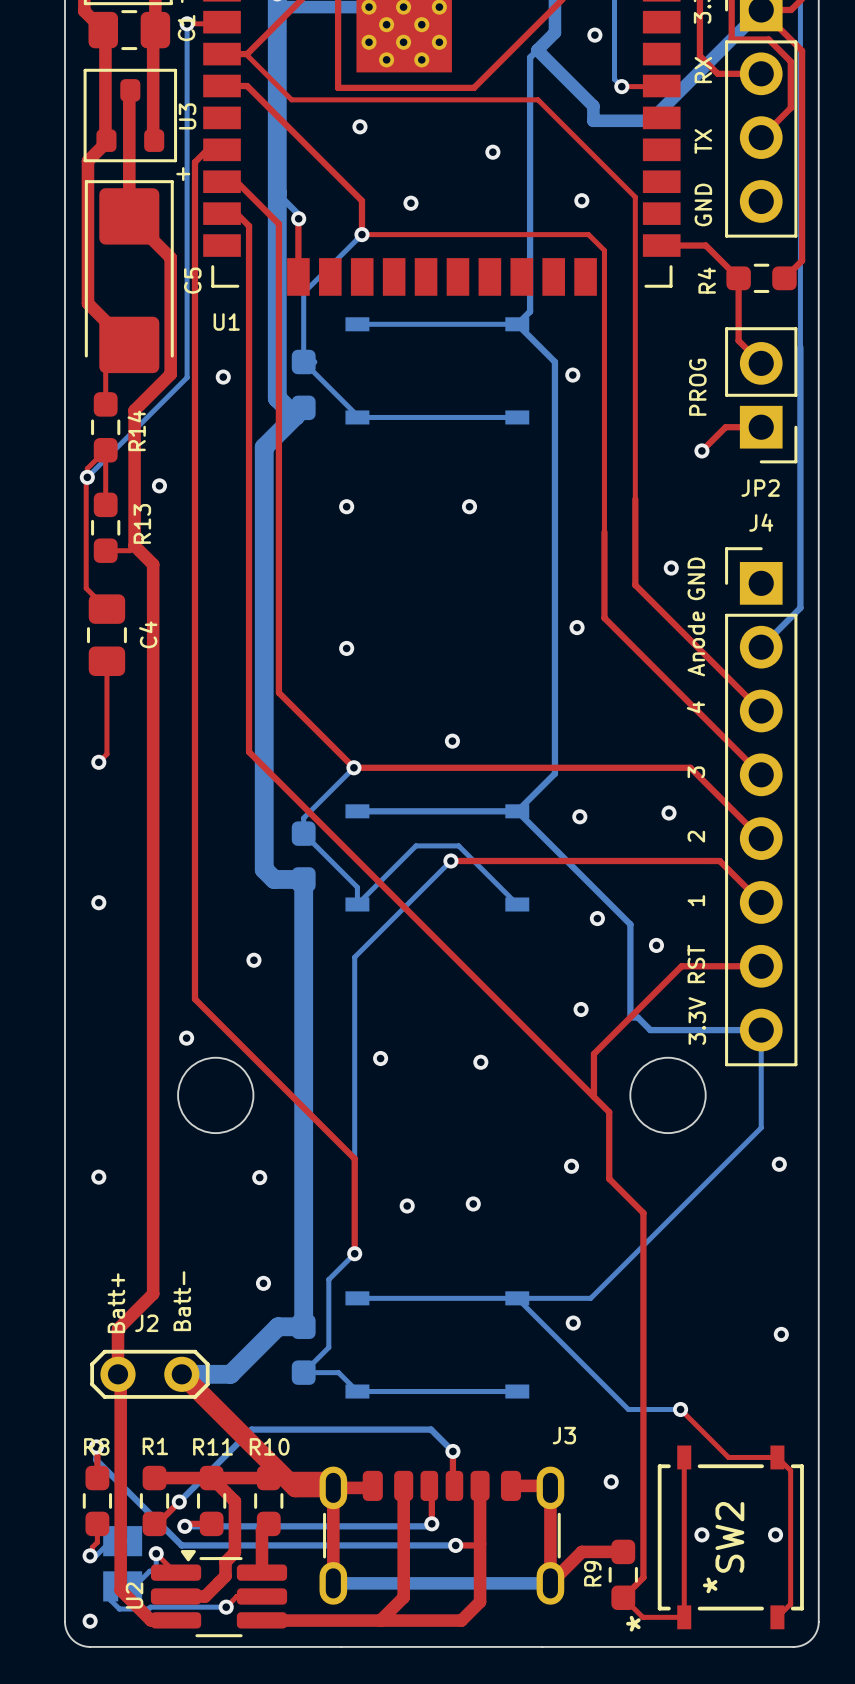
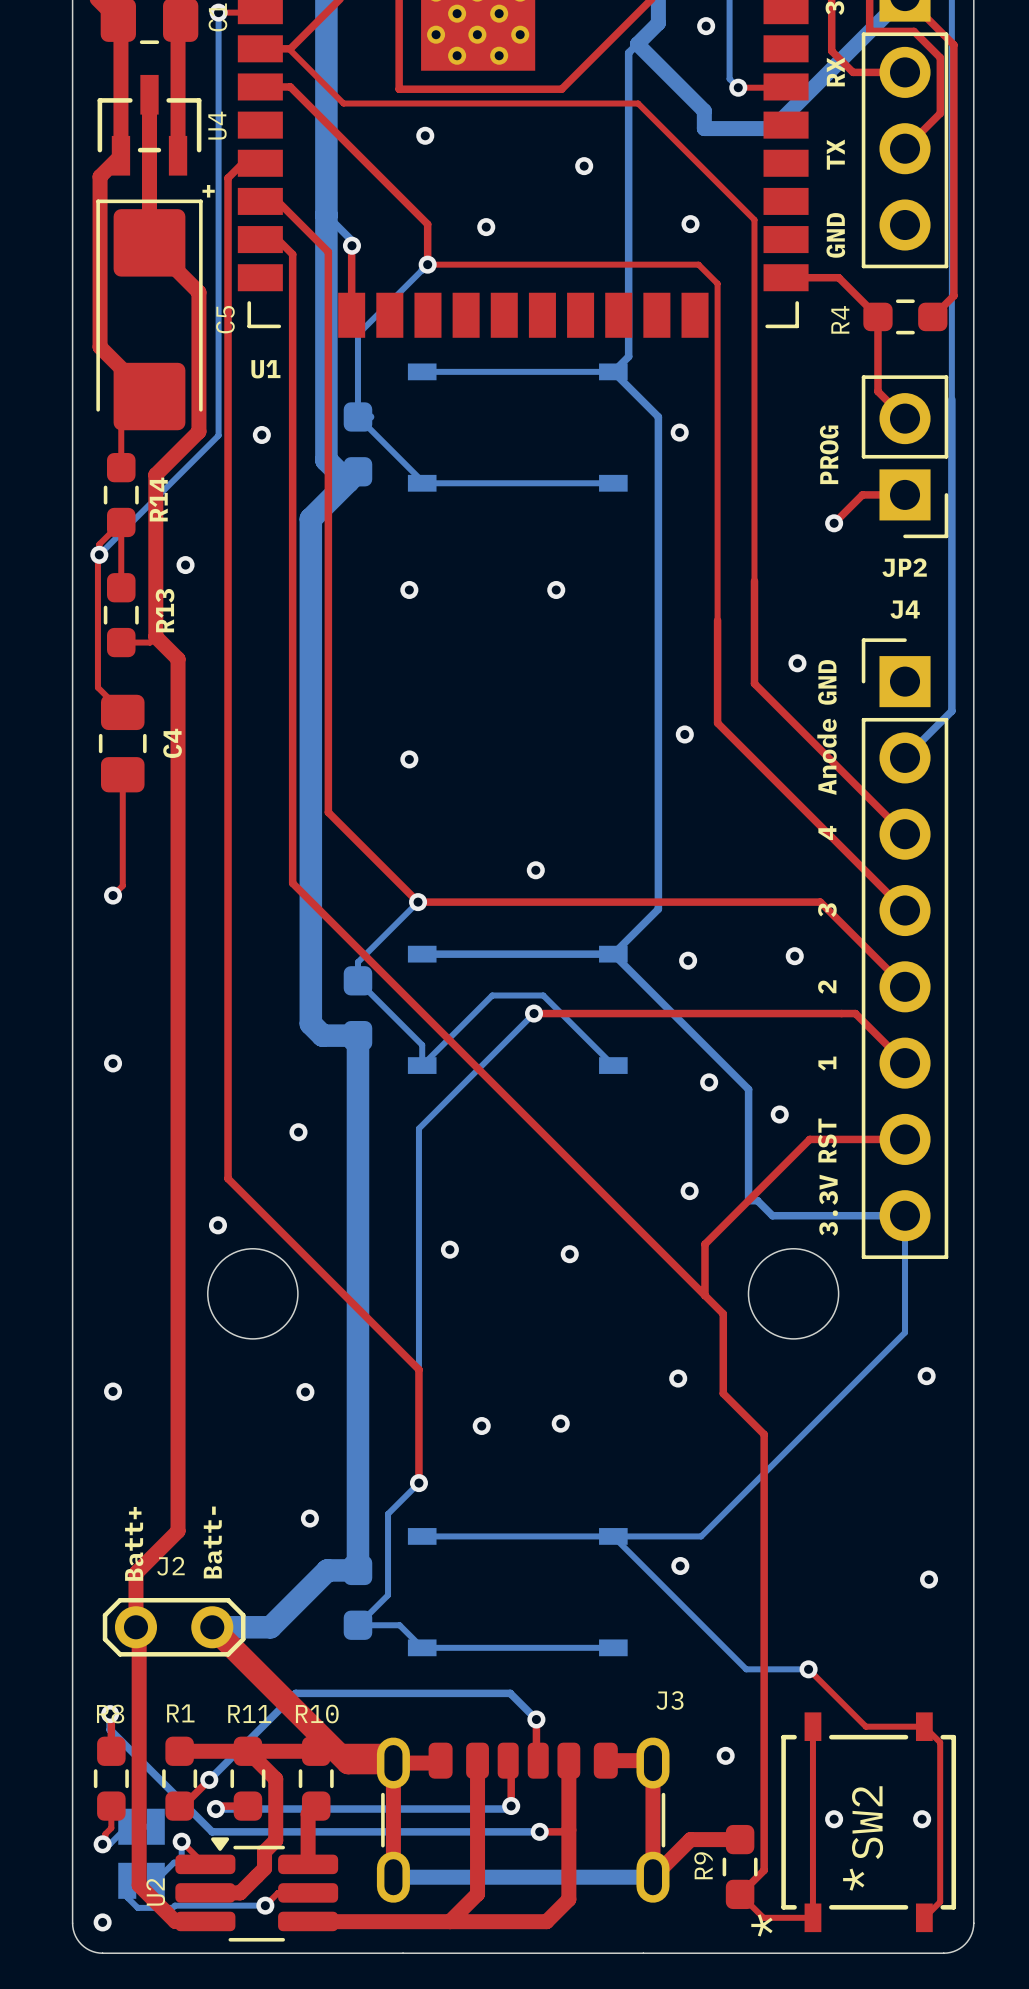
U3: (130, 115) -> none
U4: none -> (149, 125)

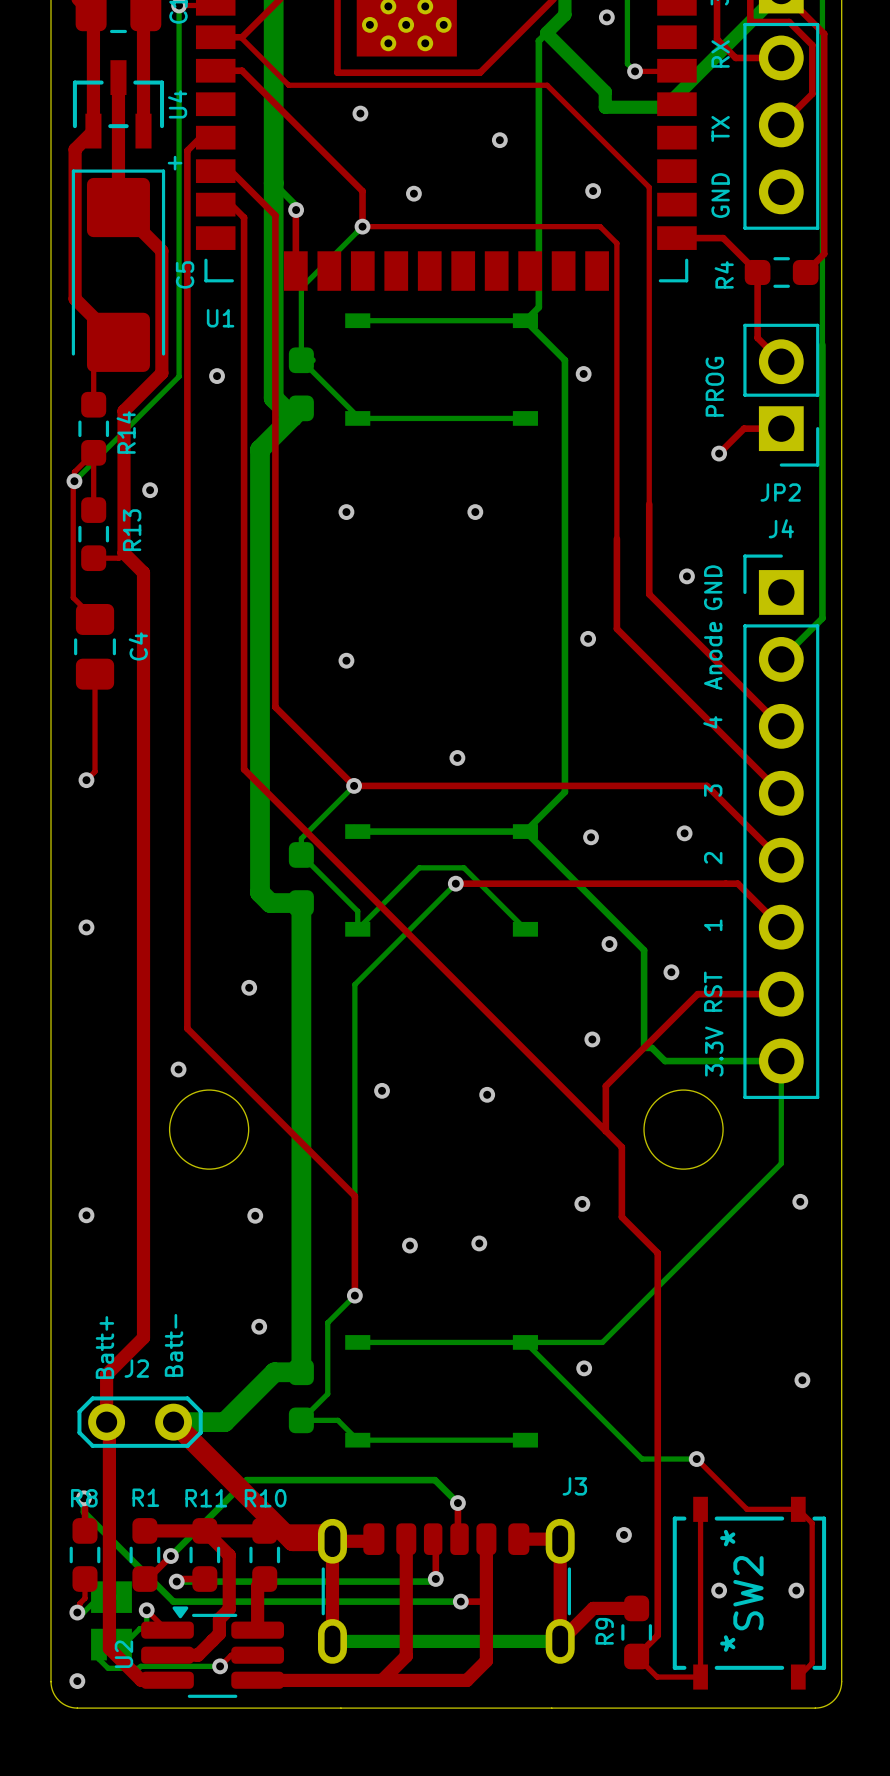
SW2 text position: * (761, 1925) -> * (727, 1538)

